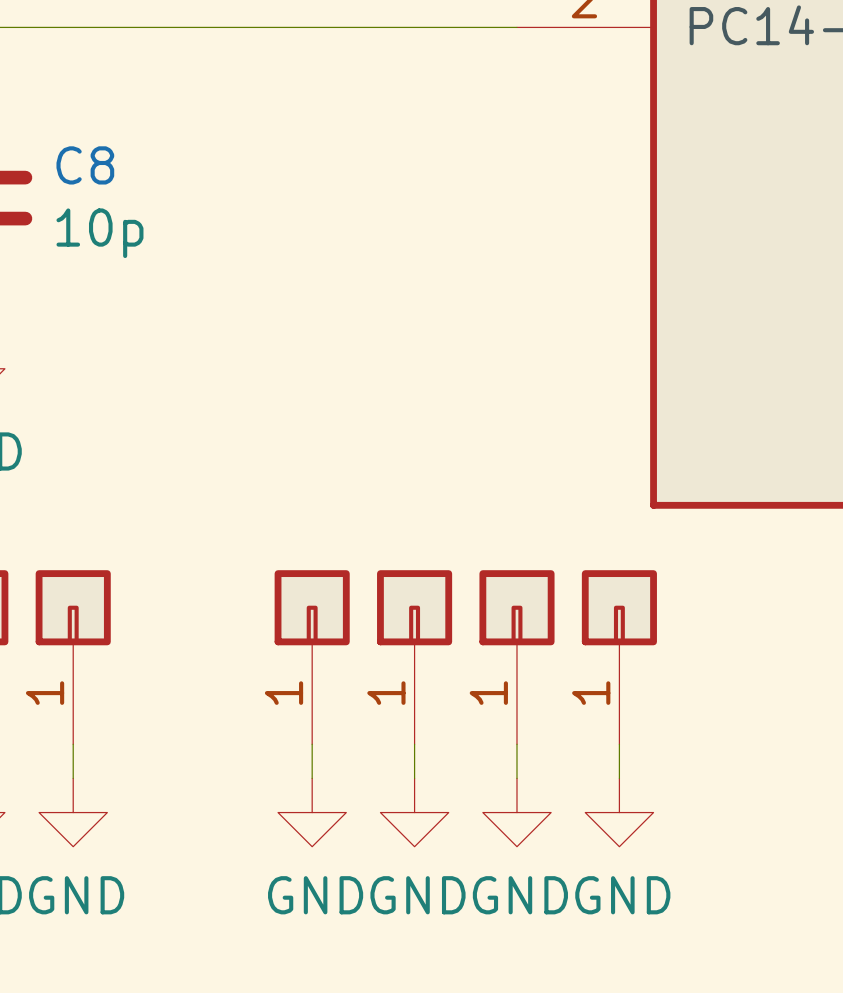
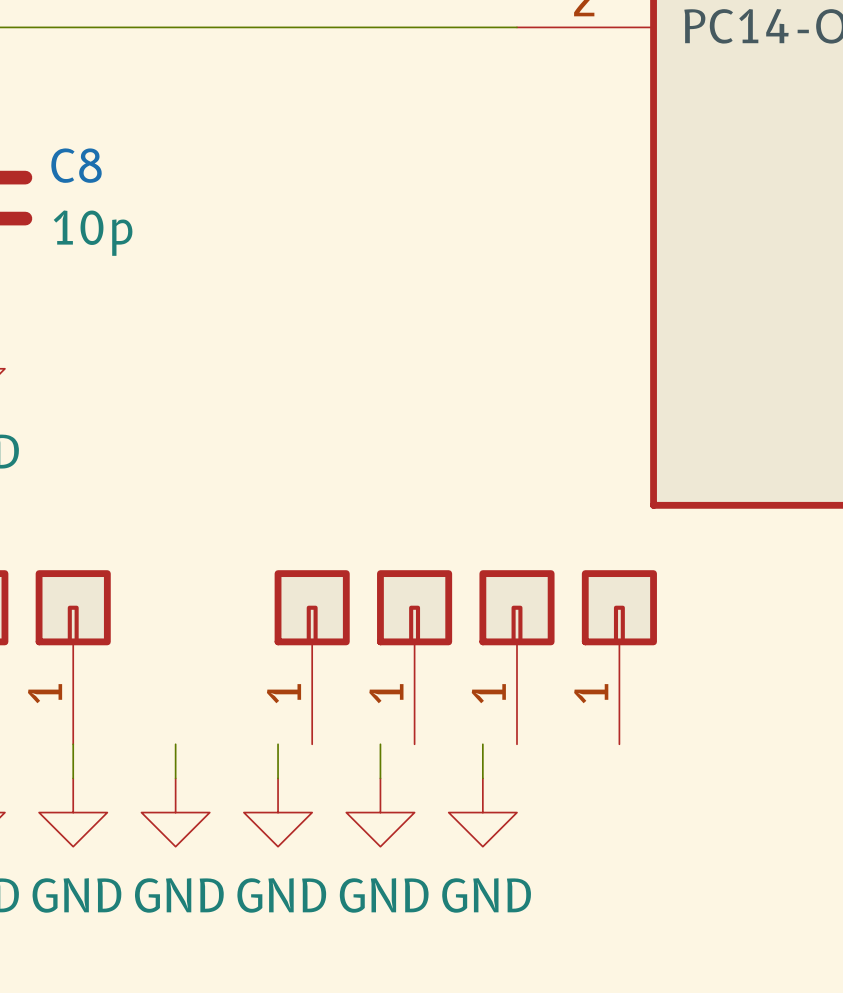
wire: (312, 744) (312, 778) -> (175, 744) (175, 778)
wire: (414, 744) (414, 778) -> (278, 744) (278, 778)
wire: (516, 744) (516, 778) -> (380, 744) (380, 778)
wire: (619, 744) (619, 778) -> (482, 744) (482, 778)
power symbol: none -> GND (175, 812)
power symbol: none -> GND (278, 812)
power symbol: GND (312, 812) -> none
power symbol: none -> GND (380, 812)
power symbol: GND (414, 812) -> none
power symbol: none -> GND (482, 812)
power symbol: GND (516, 812) -> none
power symbol: GND (619, 812) -> none

